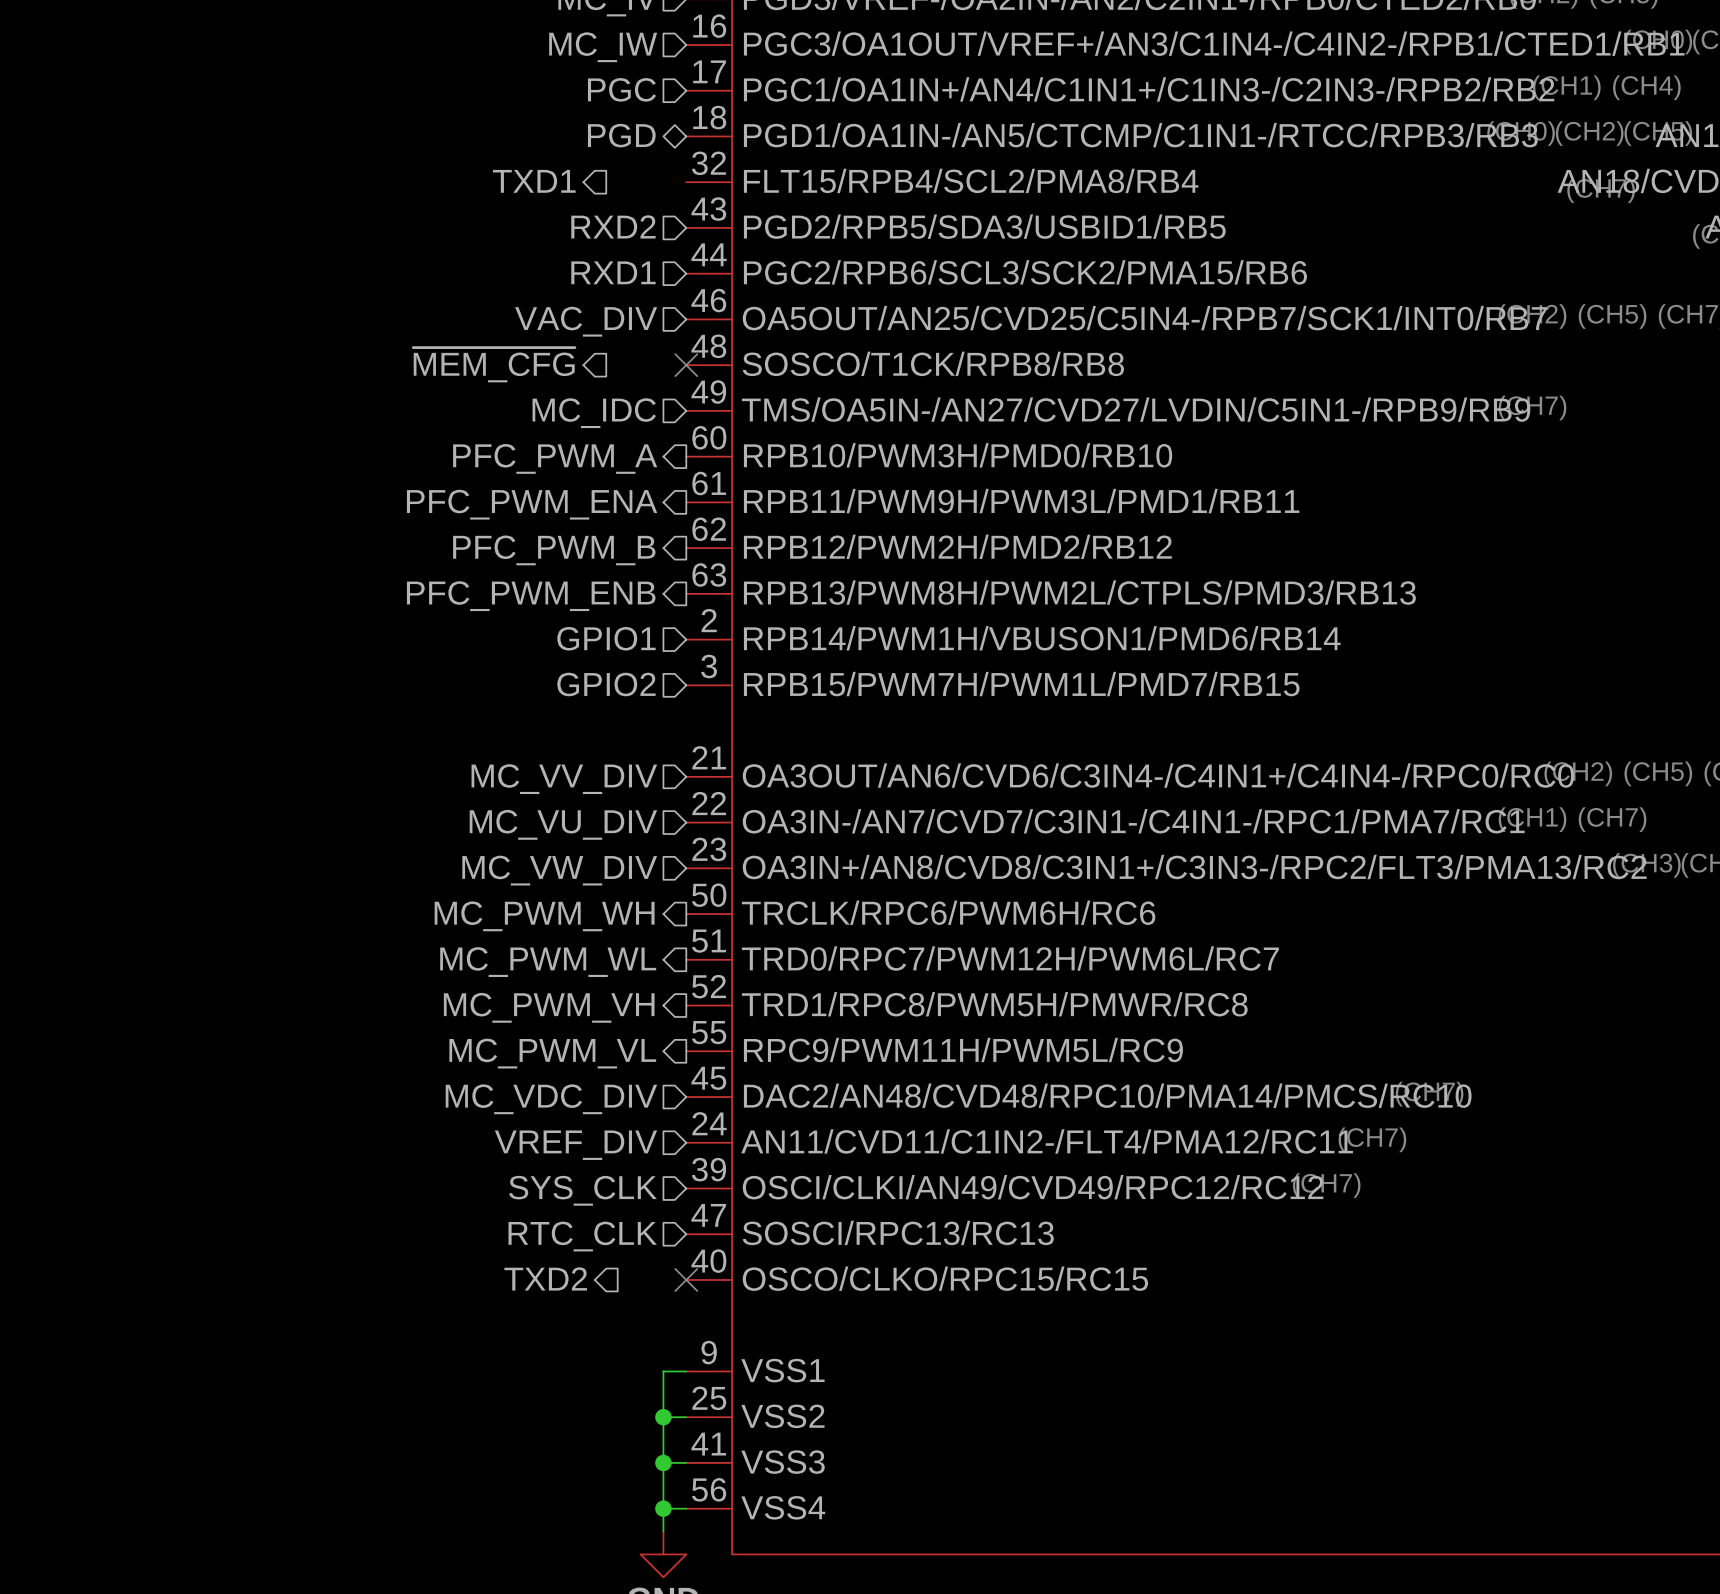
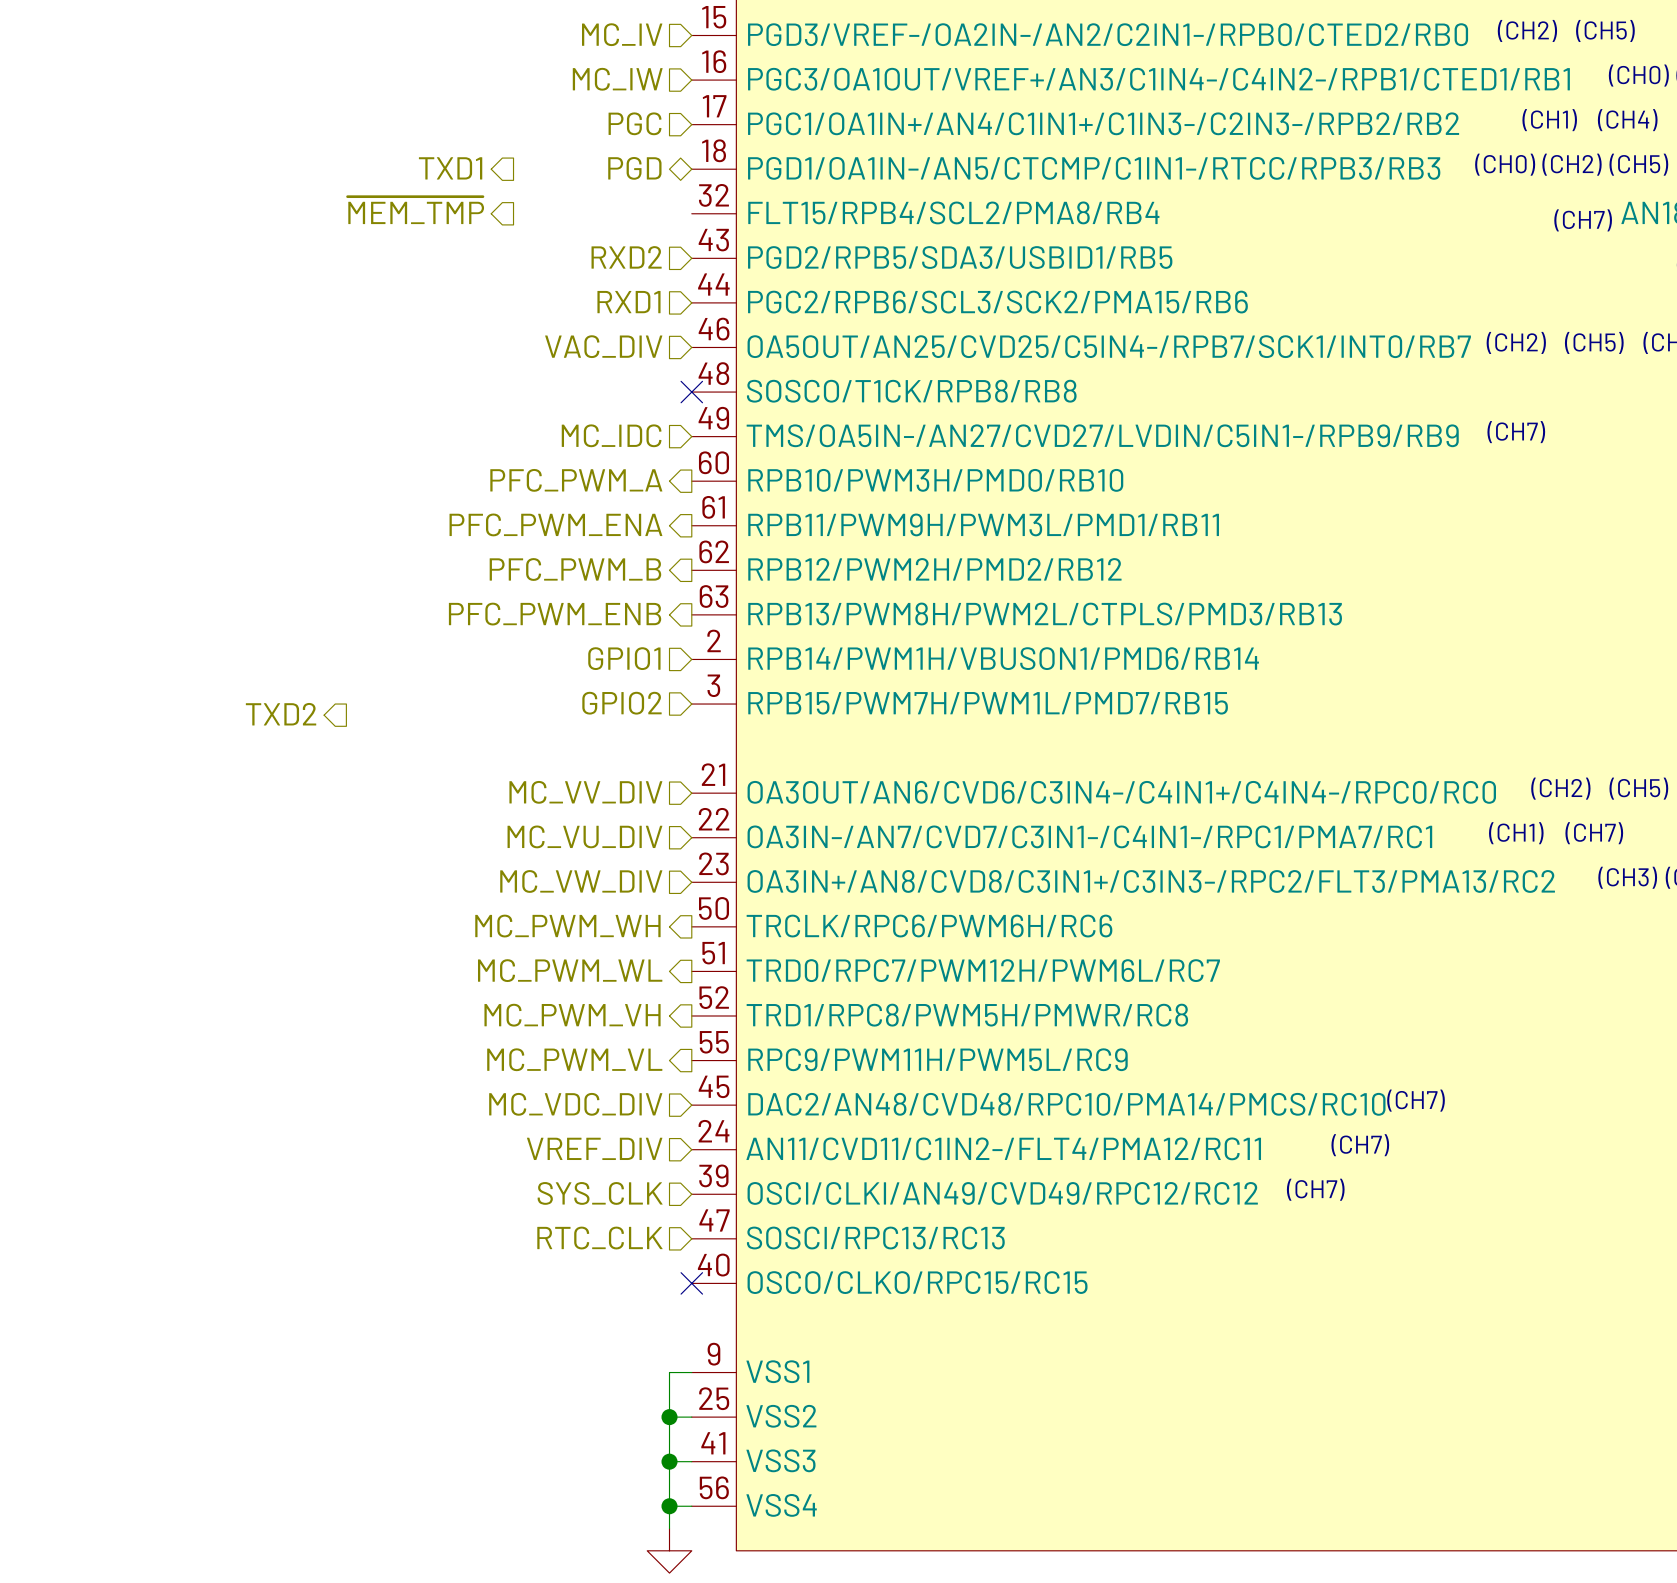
hierarchical label position: TXD1 (534, 181) -> TXD1 (450, 168)
hierarchical label: none -> ~{MEM_TMP} (415, 210)
hierarchical label: ~{MEM_CFG} (494, 364) -> none
hierarchical label: none -> TXD2 (281, 714)
hierarchical label: TXD2 (545, 1278) -> none

